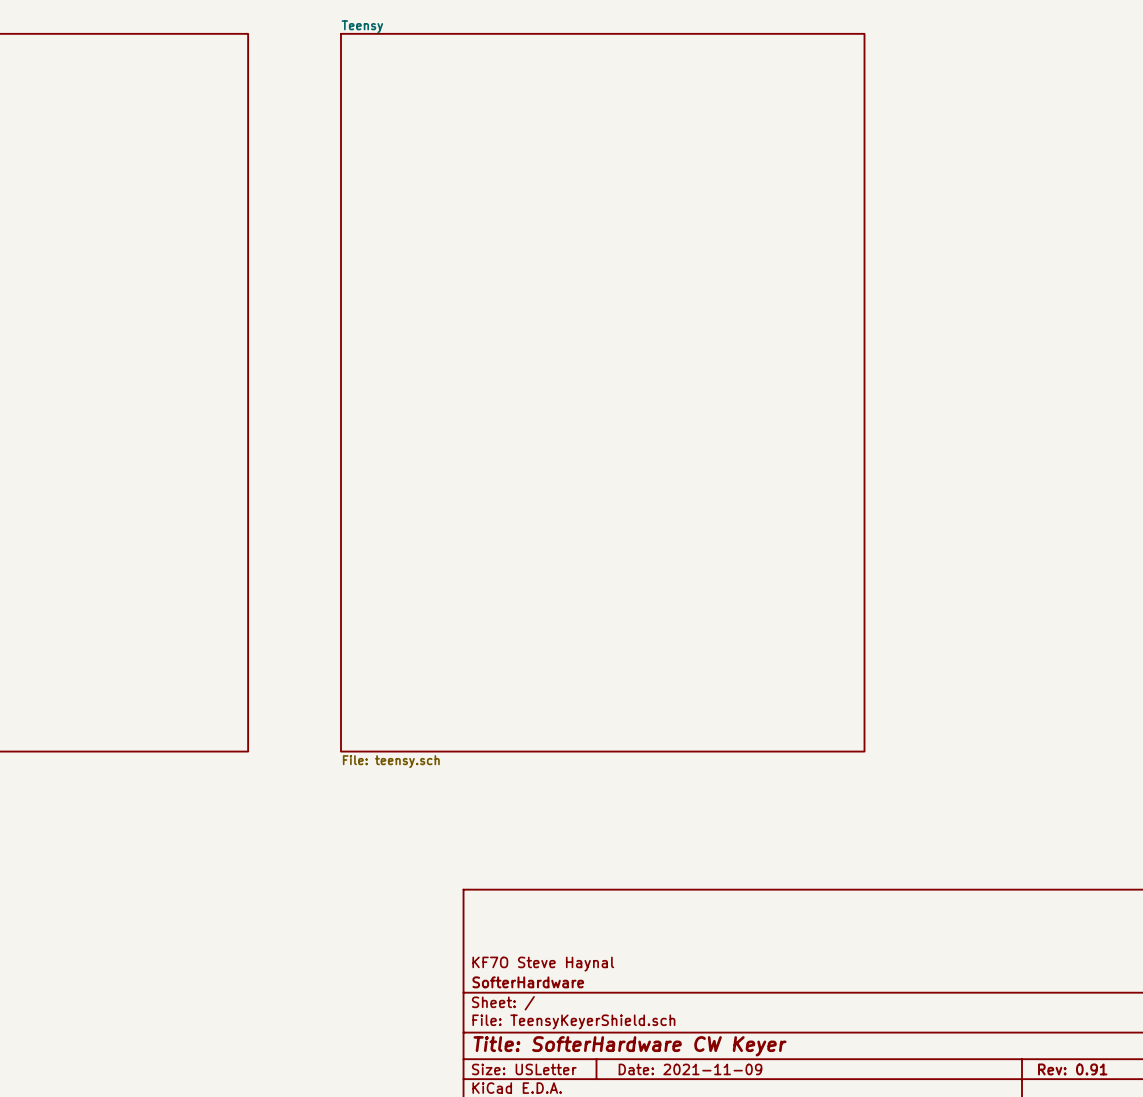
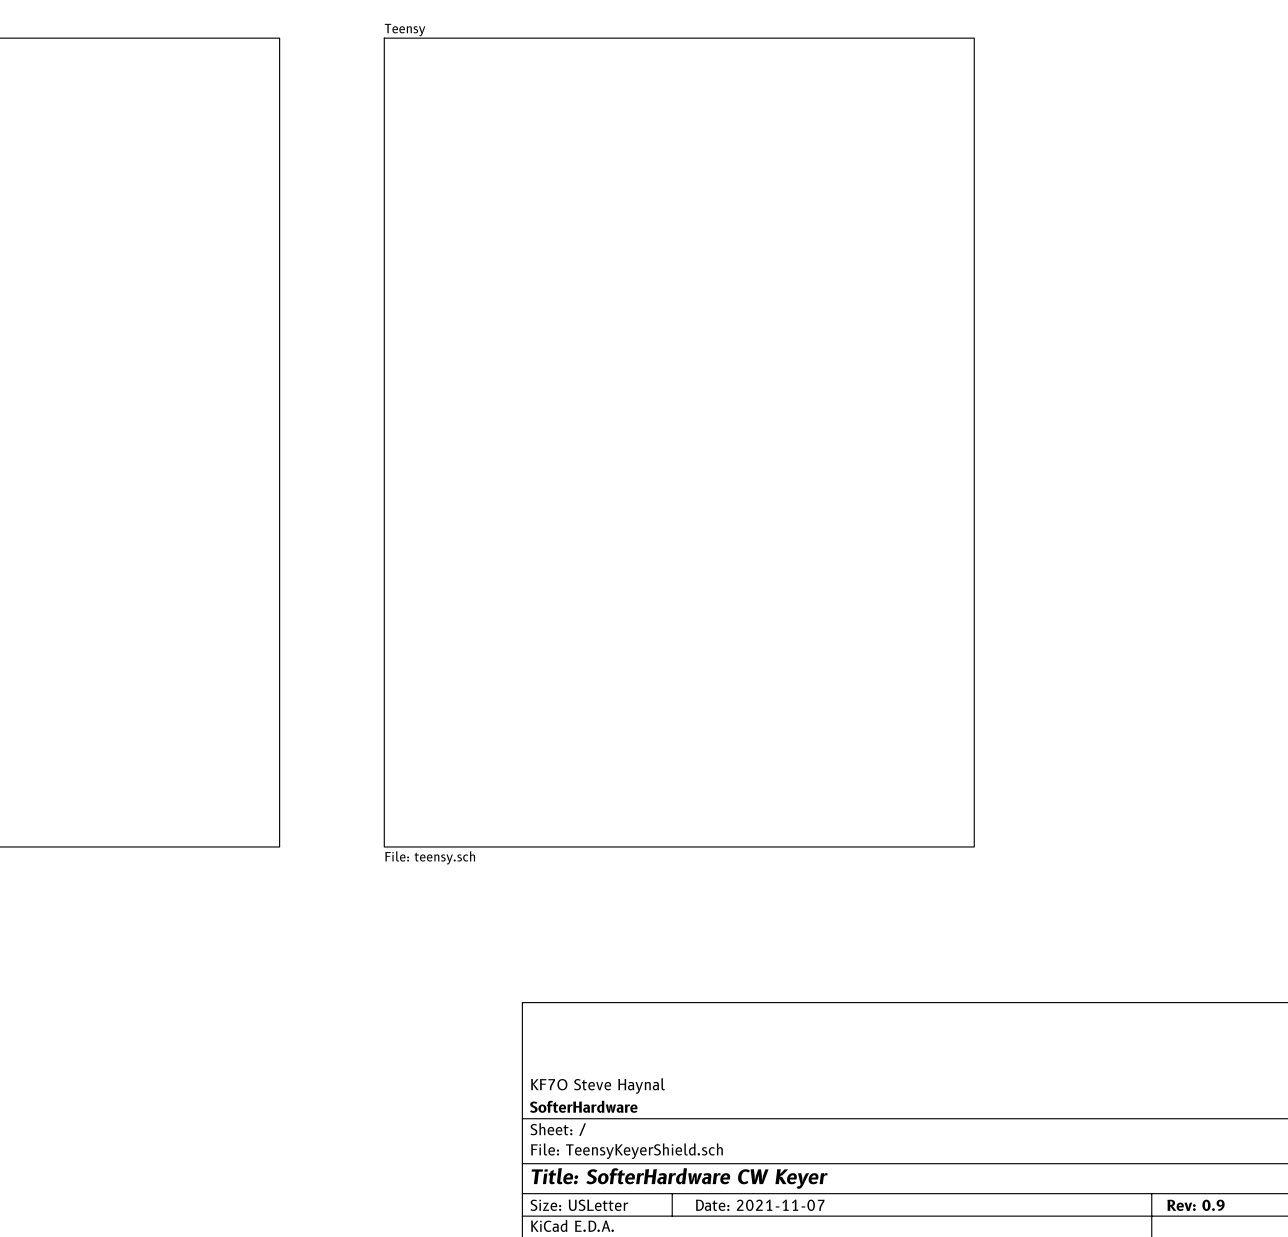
title block: Date: 2021-11-09 (690, 1069) -> Date: 2021-11-07 (760, 1205)
title block: Rev: 0.91 (1072, 1069) -> Rev: 0.9 (1196, 1205)

